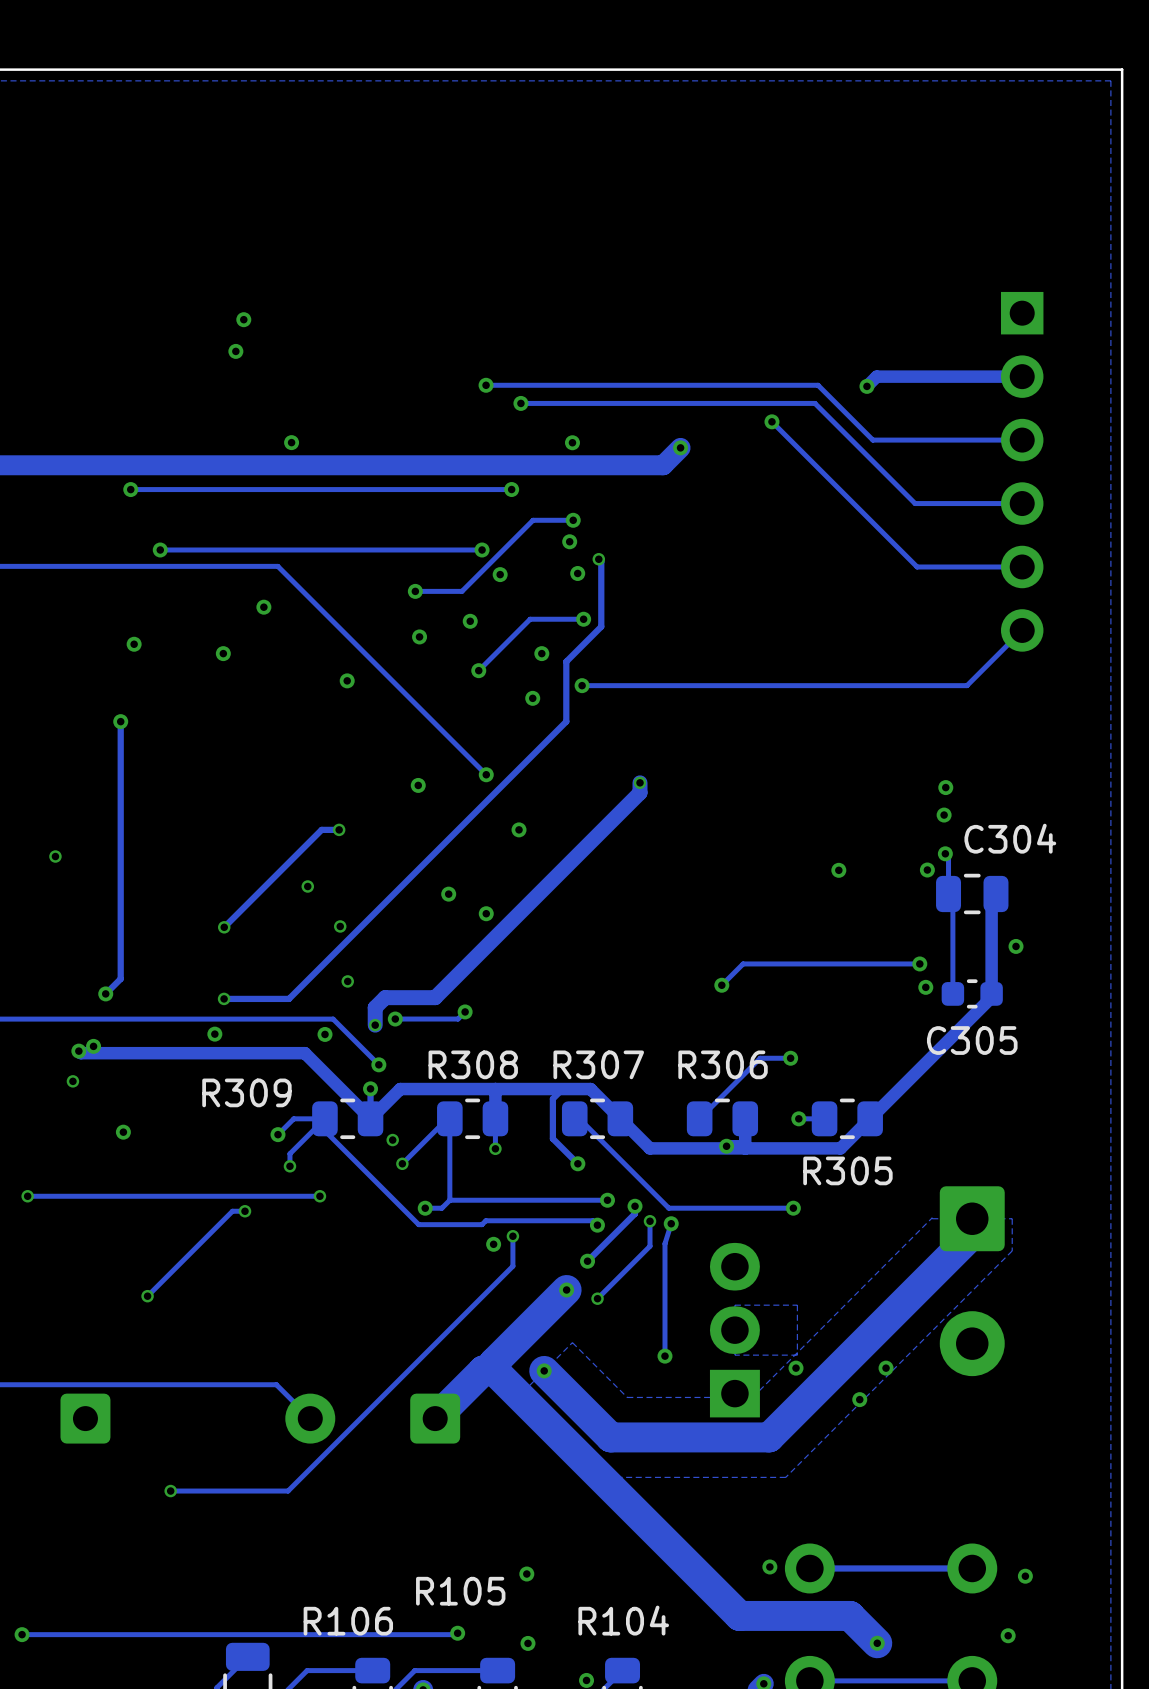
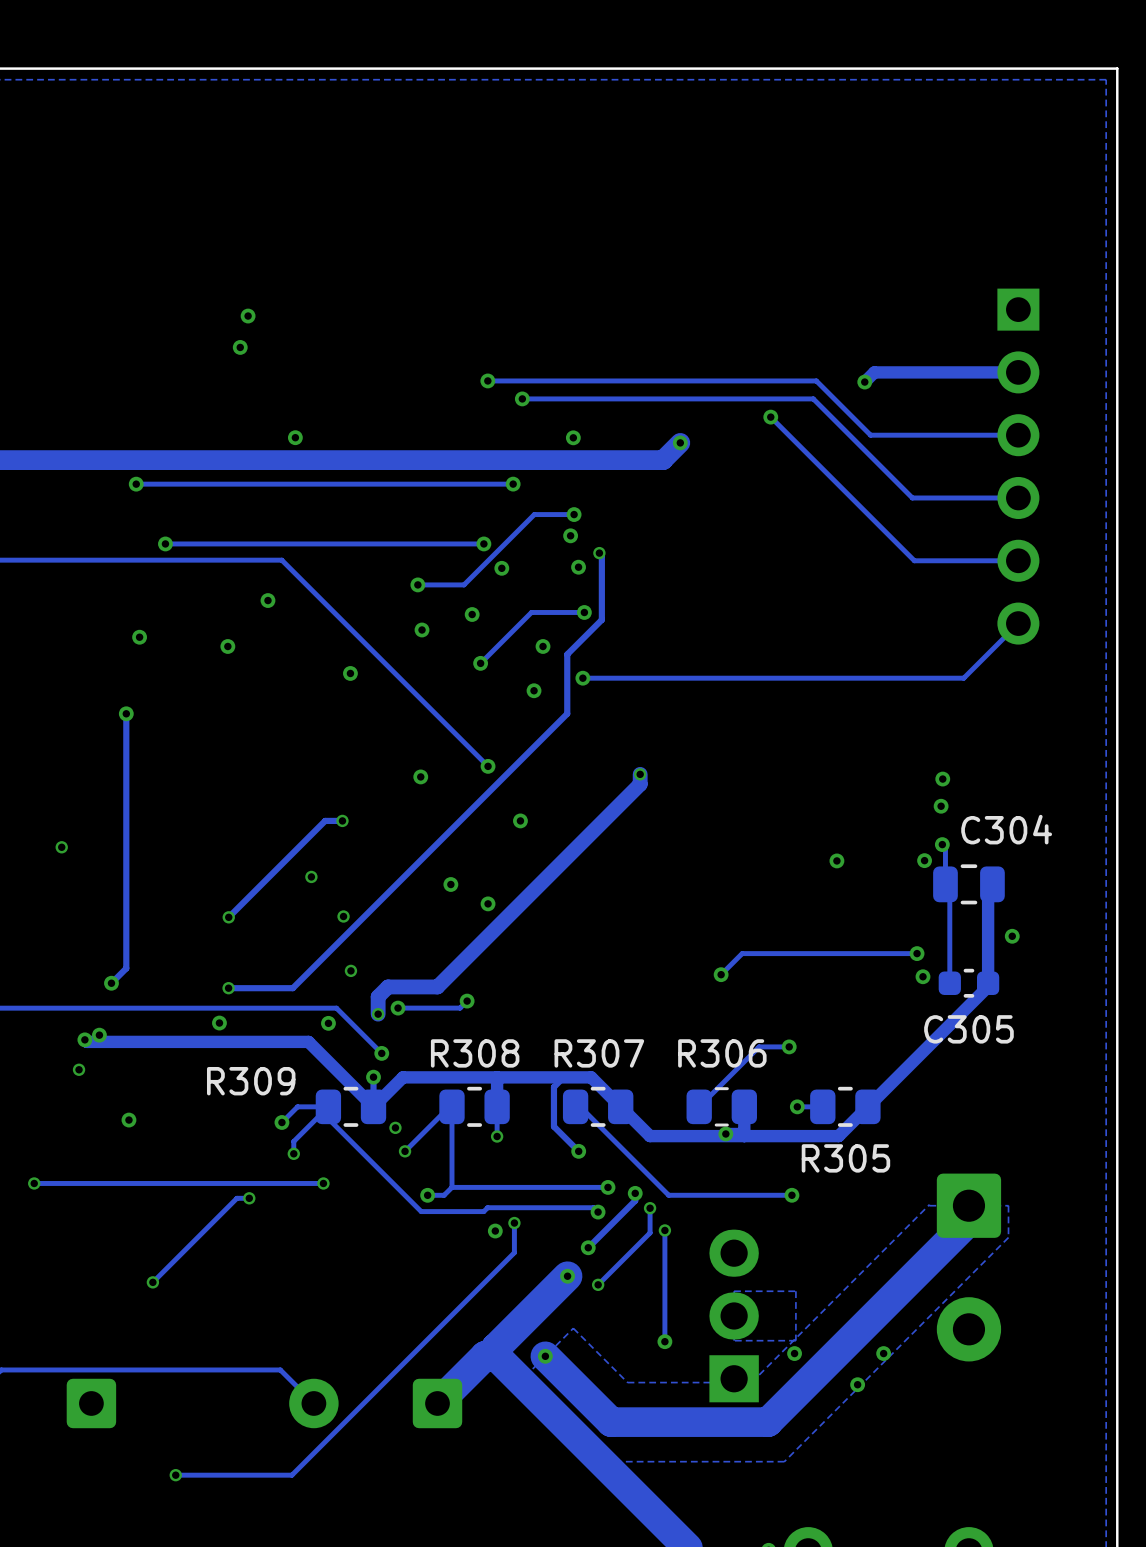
part footprint: [686, 1098, 759, 1137] -> [686, 1087, 757, 1127]
track: (671, 1223) (664, 1243) -> none
via: (671, 1223) -> none
via: none -> (664, 1230)

